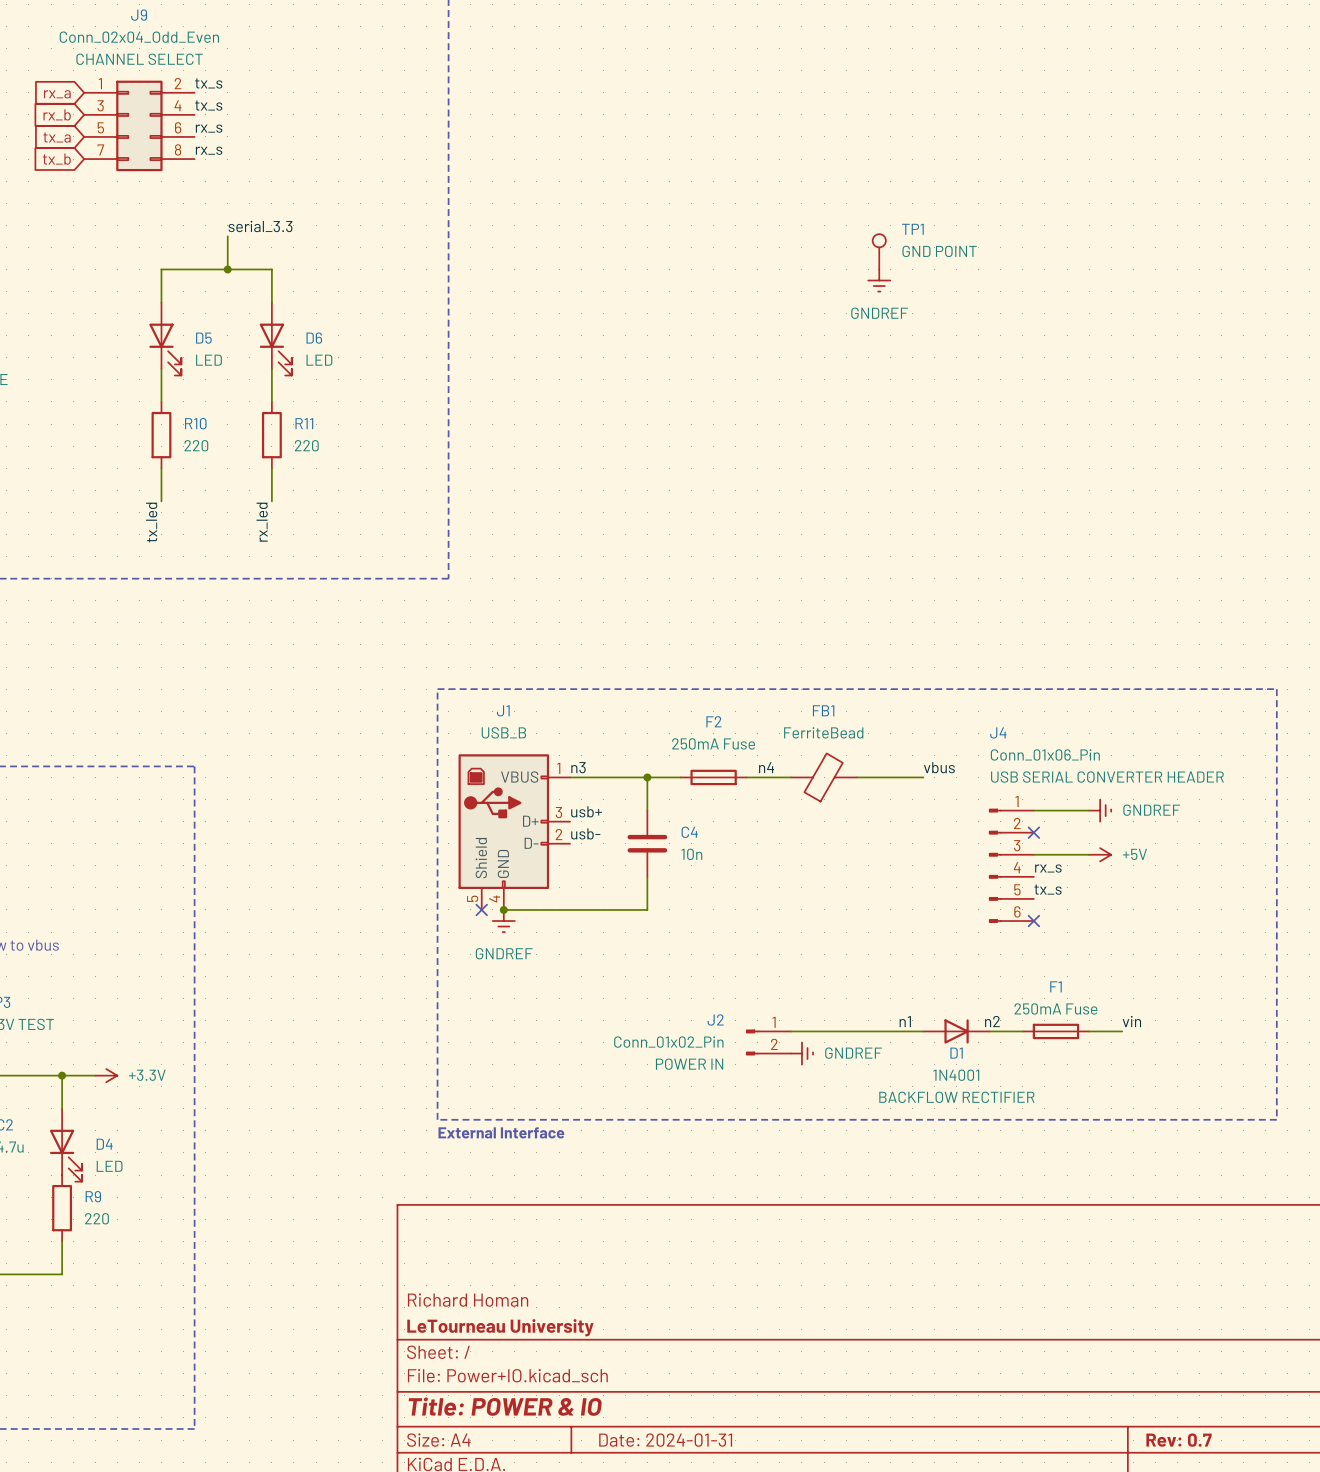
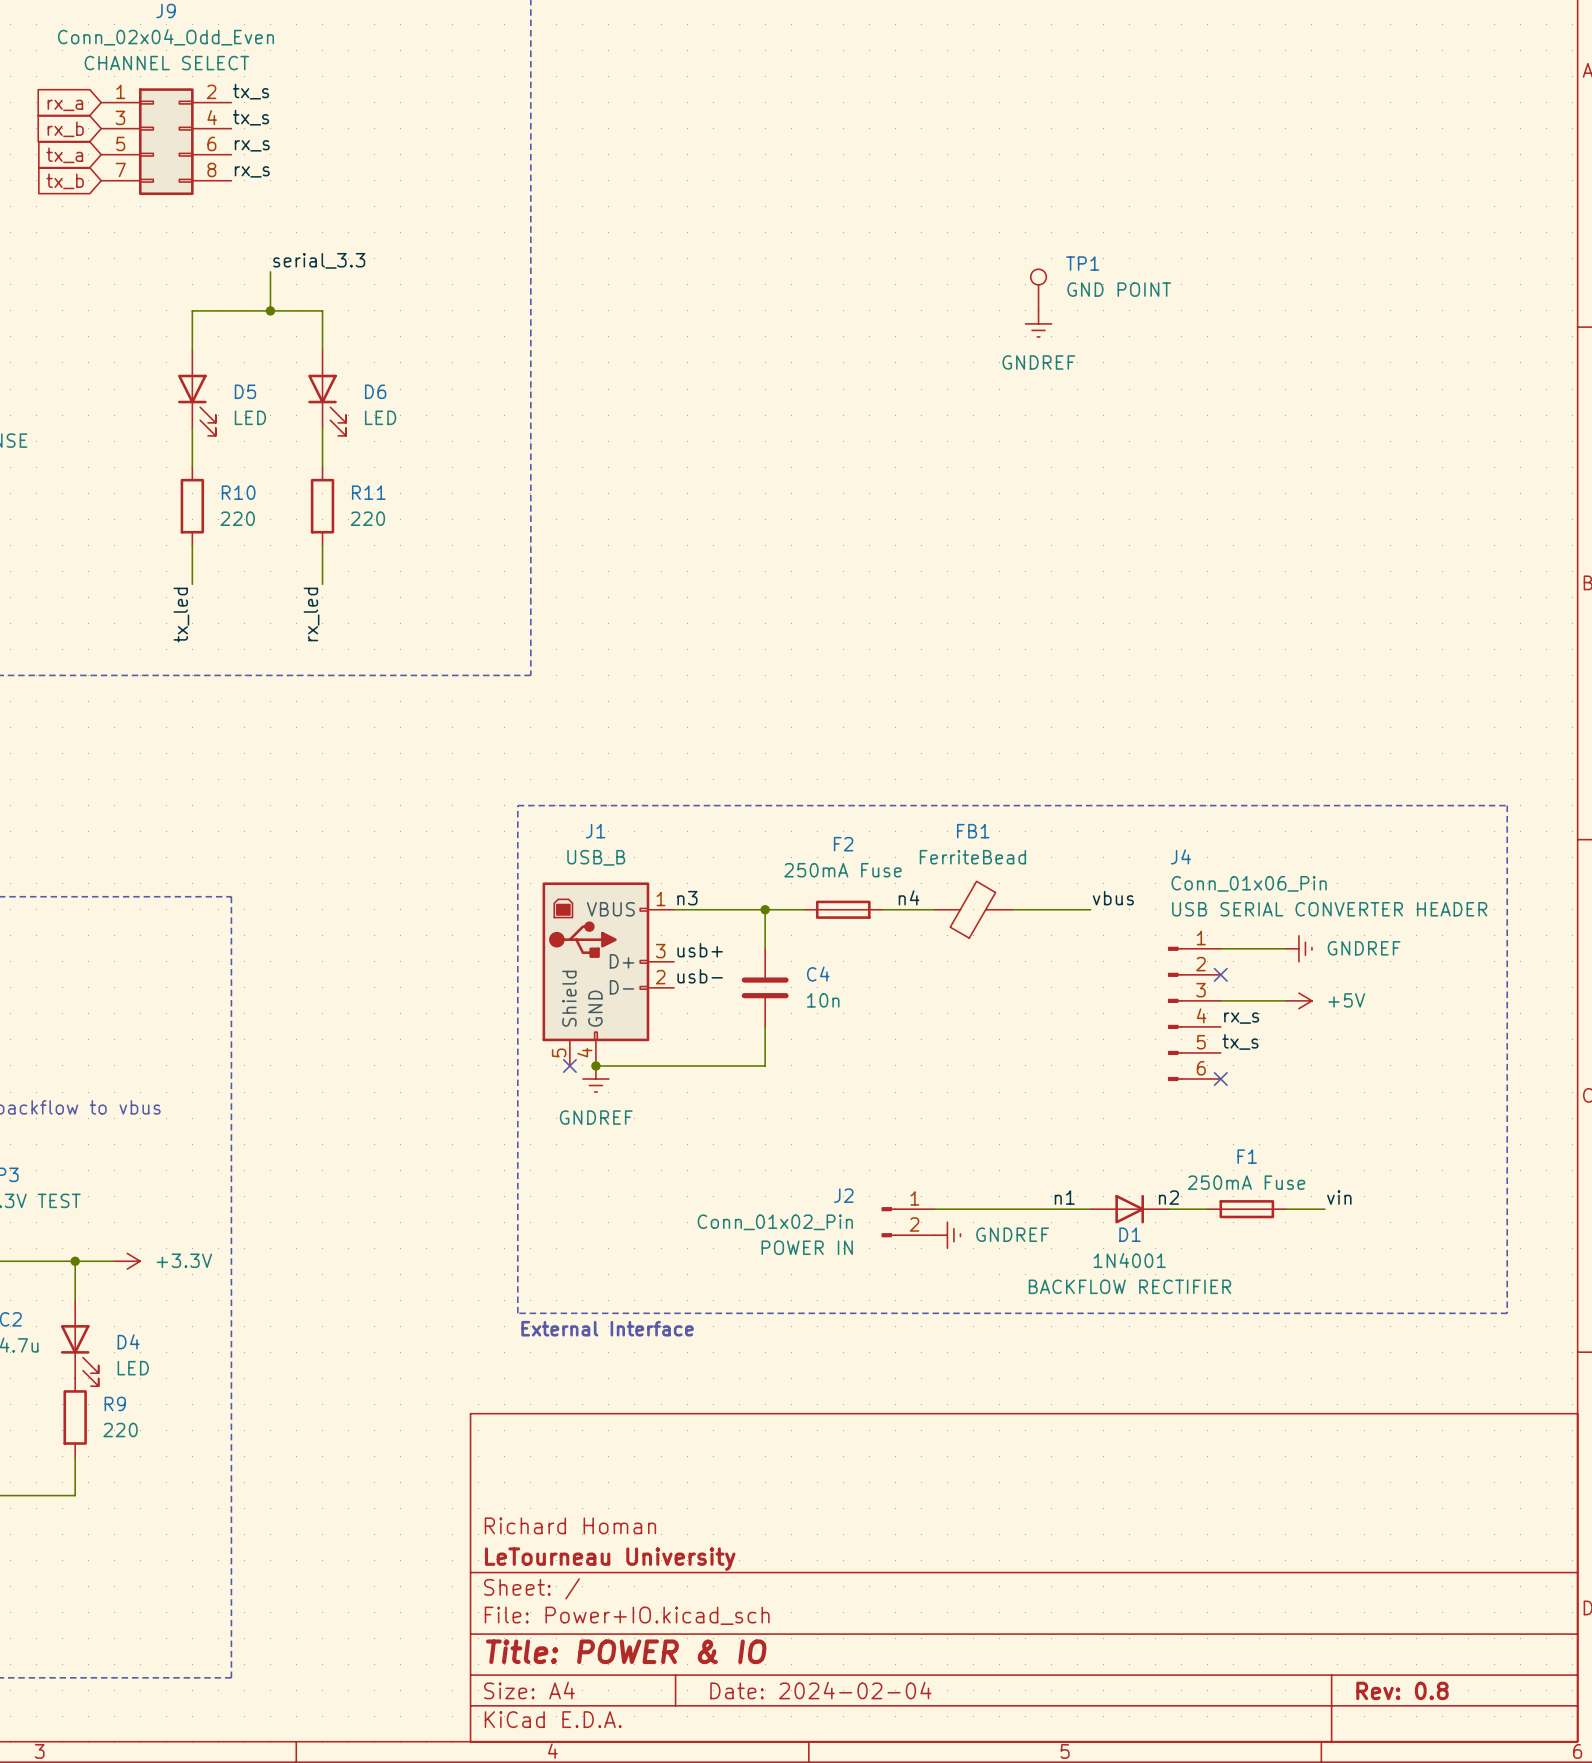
title block: Date: 2024-01-31 (665, 1440) -> Date: 2024-02-04 (820, 1690)
title block: Rev: 0.7 (1179, 1440) -> Rev: 0.8 (1402, 1690)

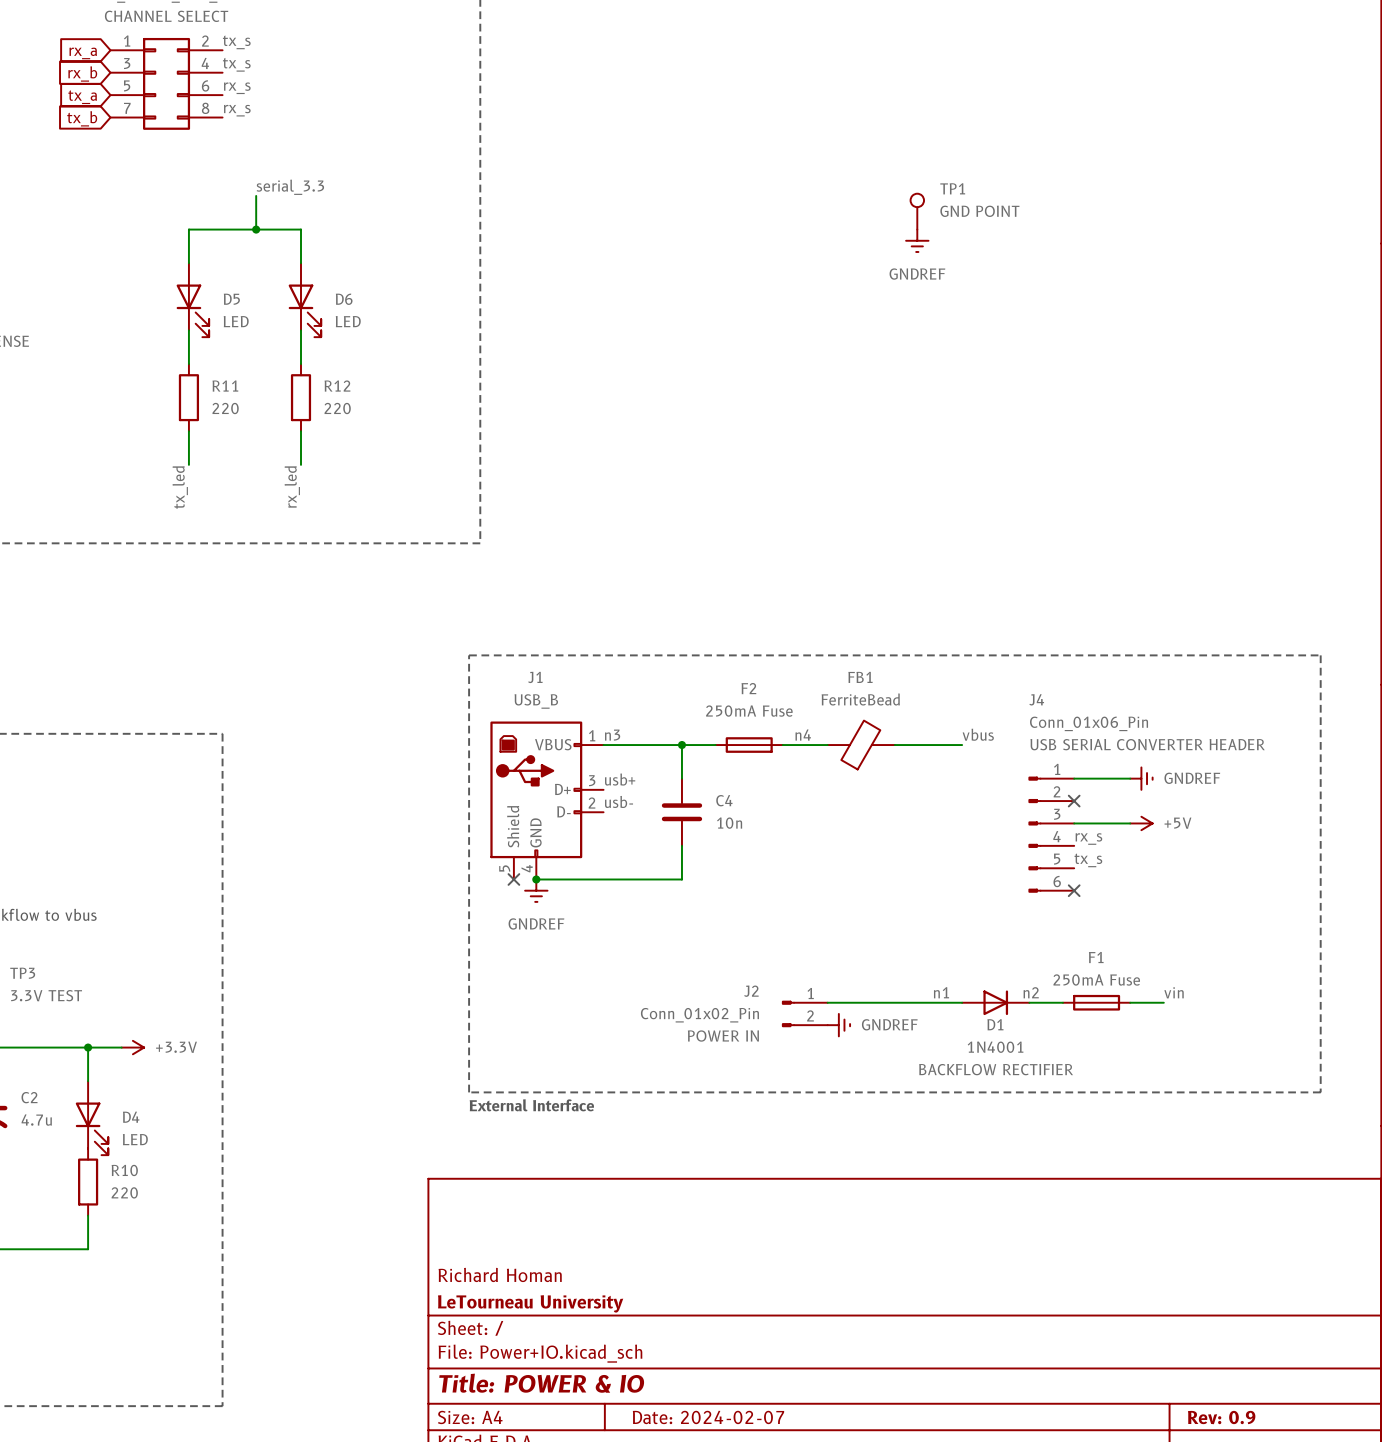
R10 name: R10 (238, 492) -> R11 (225, 386)
R11 name: R11 (368, 492) -> R12 (337, 386)
R9 name: R9 (115, 1403) -> R10 (124, 1170)
title block: Date: 2024-02-04 (820, 1690) -> Date: 2024-02-07 (708, 1417)
title block: Rev: 0.8 (1402, 1690) -> Rev: 0.9 (1221, 1417)

